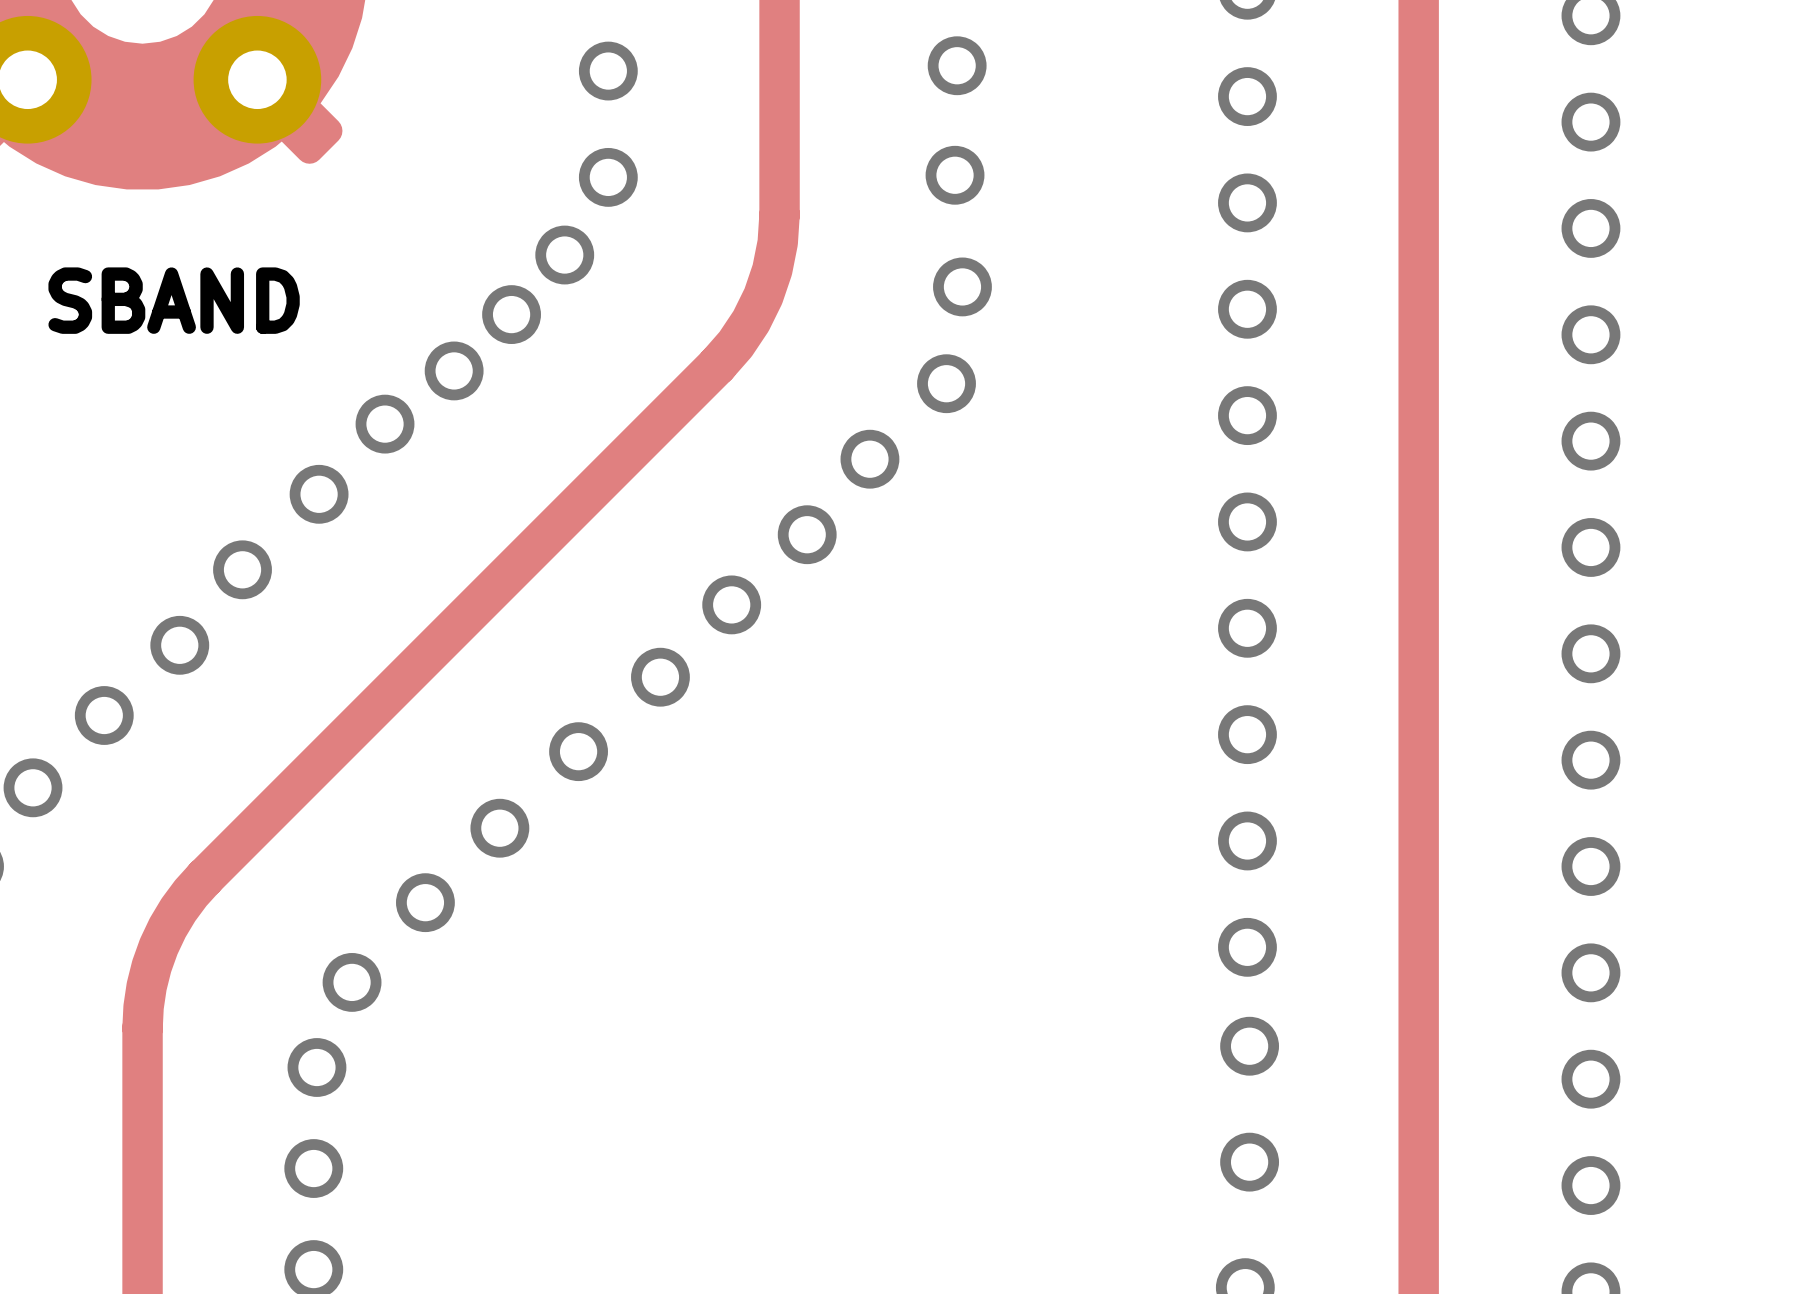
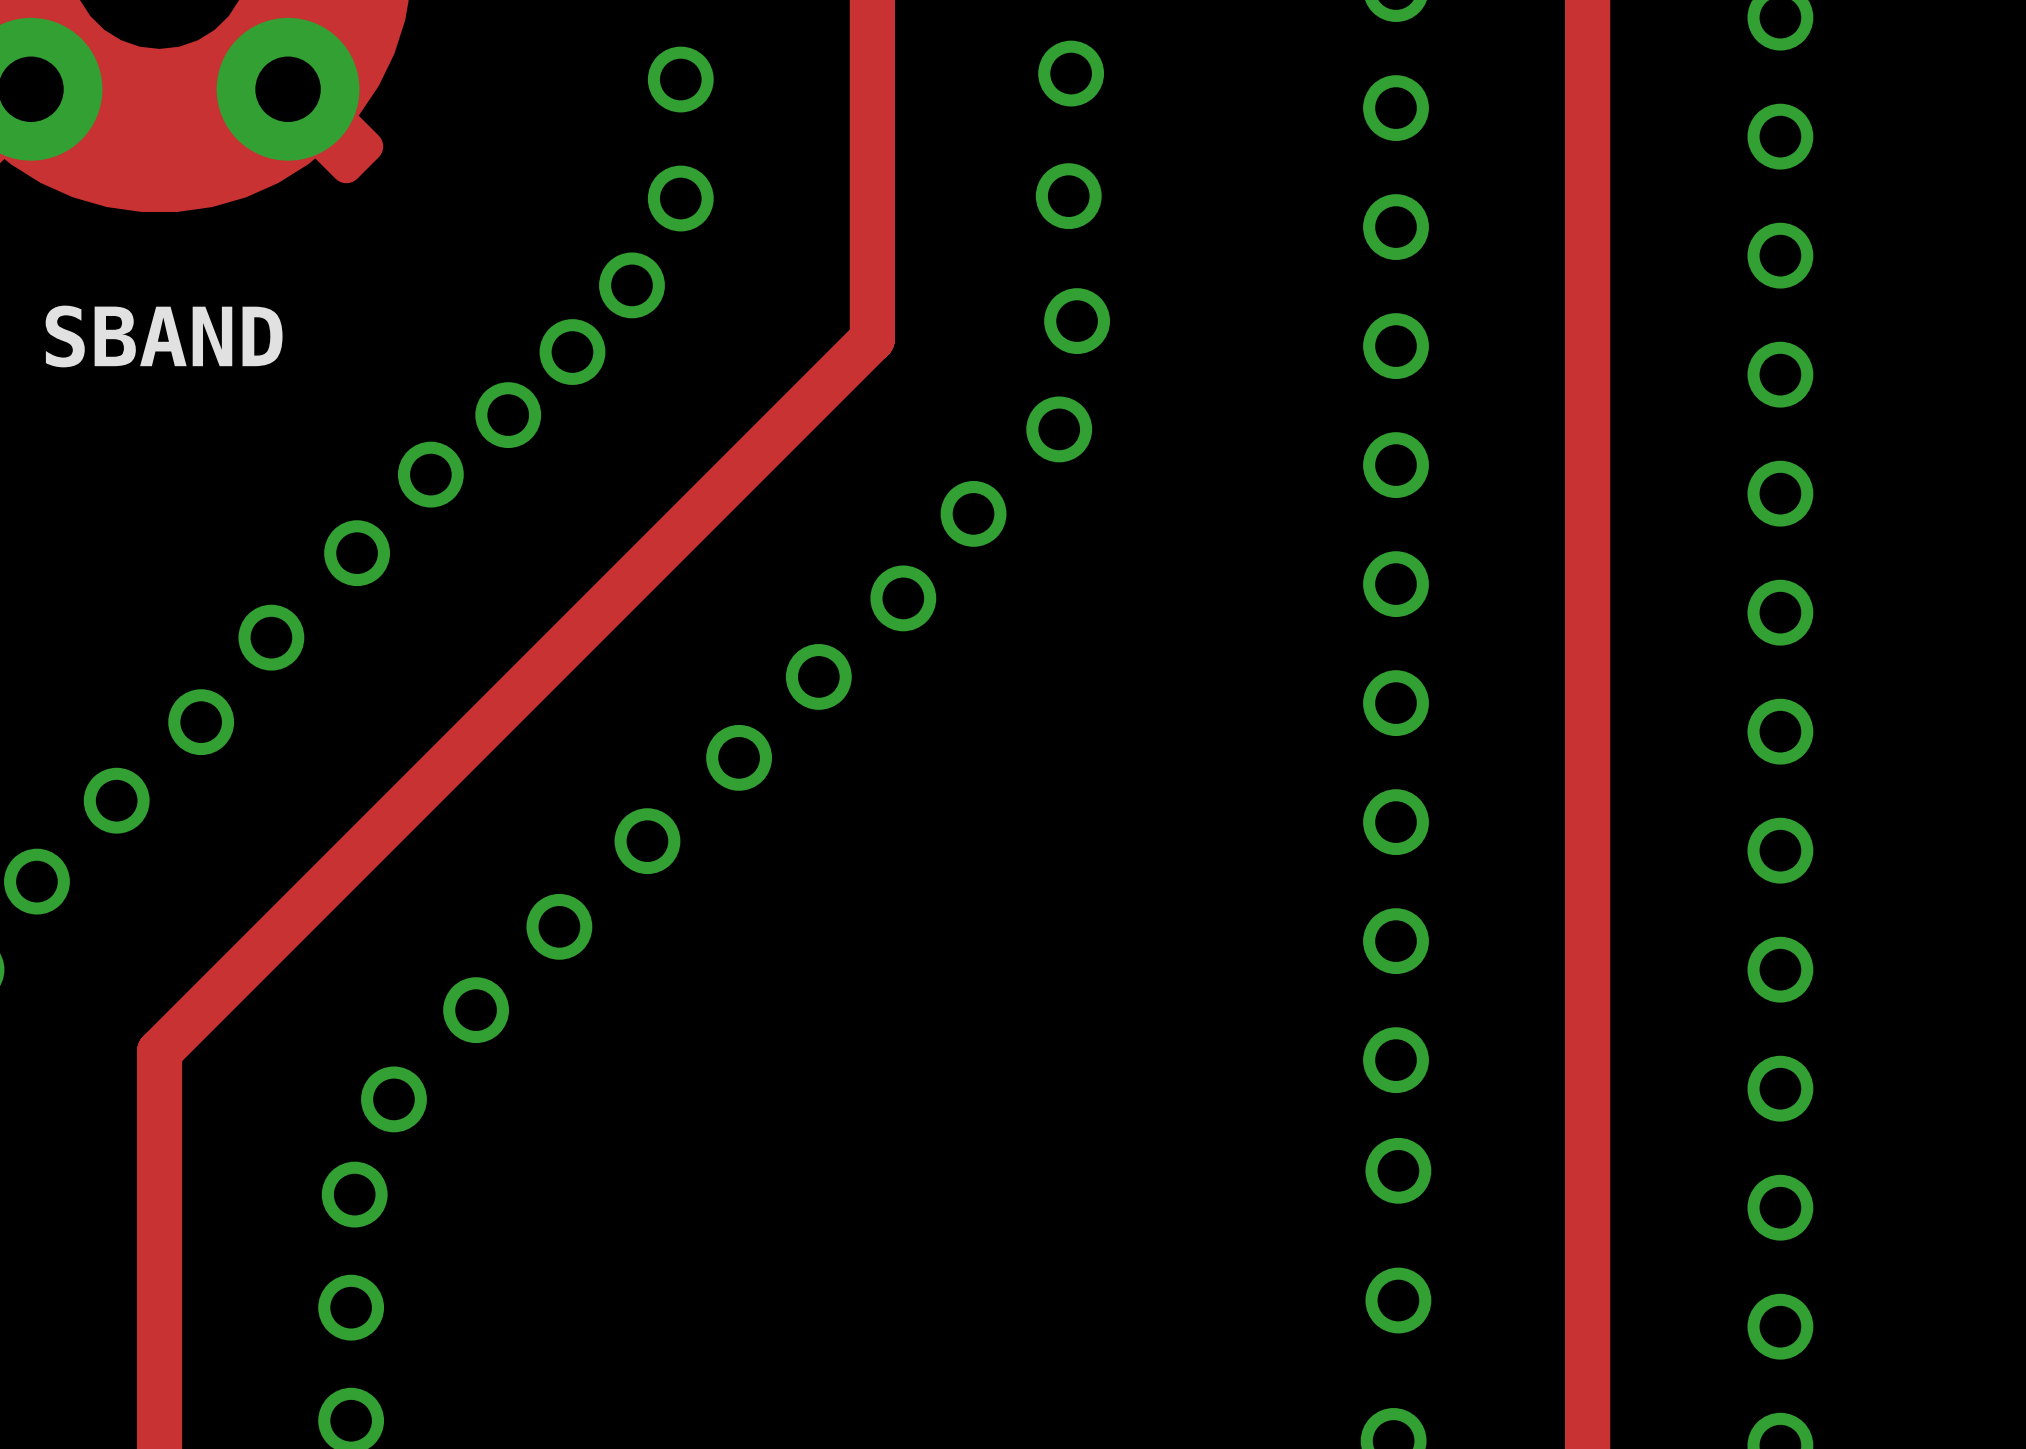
top track: (779, 214) (777, 242) (772, 269) (763, 296) (751, 321) (735, 344) (717, 365) -> (872, 240) (872, 338) (802, 408)
top track: (204, 877) (178, 909) (158, 946) (146, 986) (142, 1027) -> (229, 982) (159, 1051) (159, 1150)

